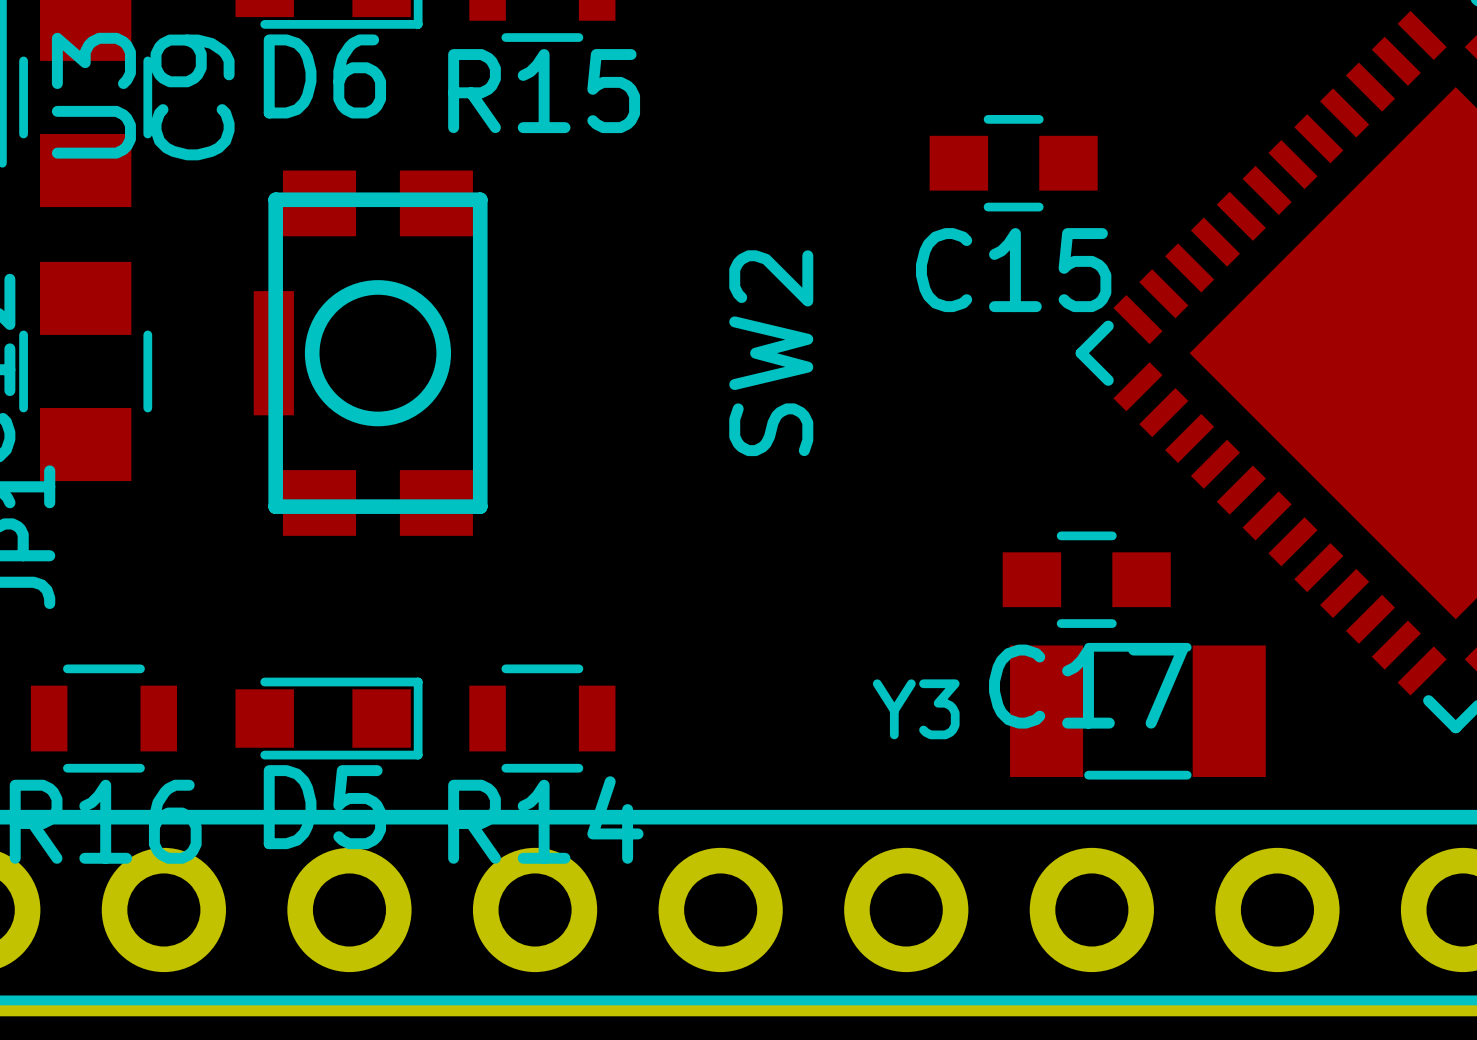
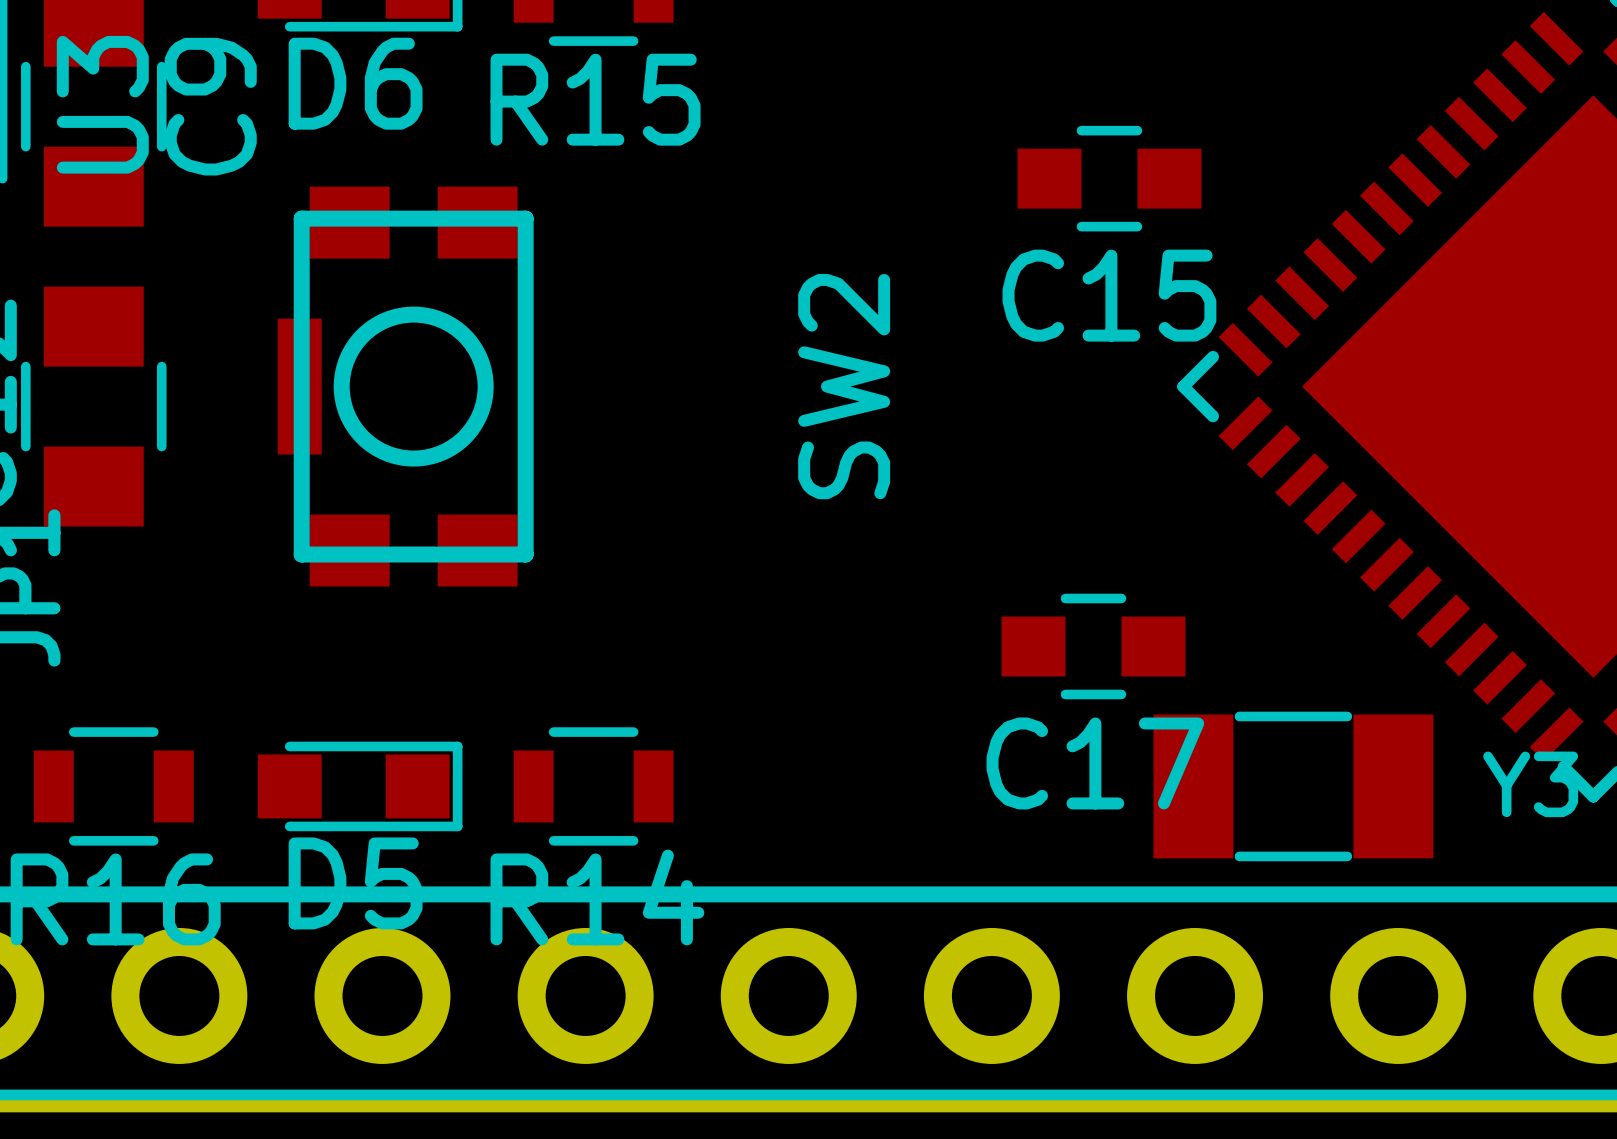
C17 position: (1086, 579) -> (1093, 646)
Y3 name position: Y3 (916, 709) -> Y3 (1530, 784)
Y3 position: (1137, 711) -> (1293, 786)

